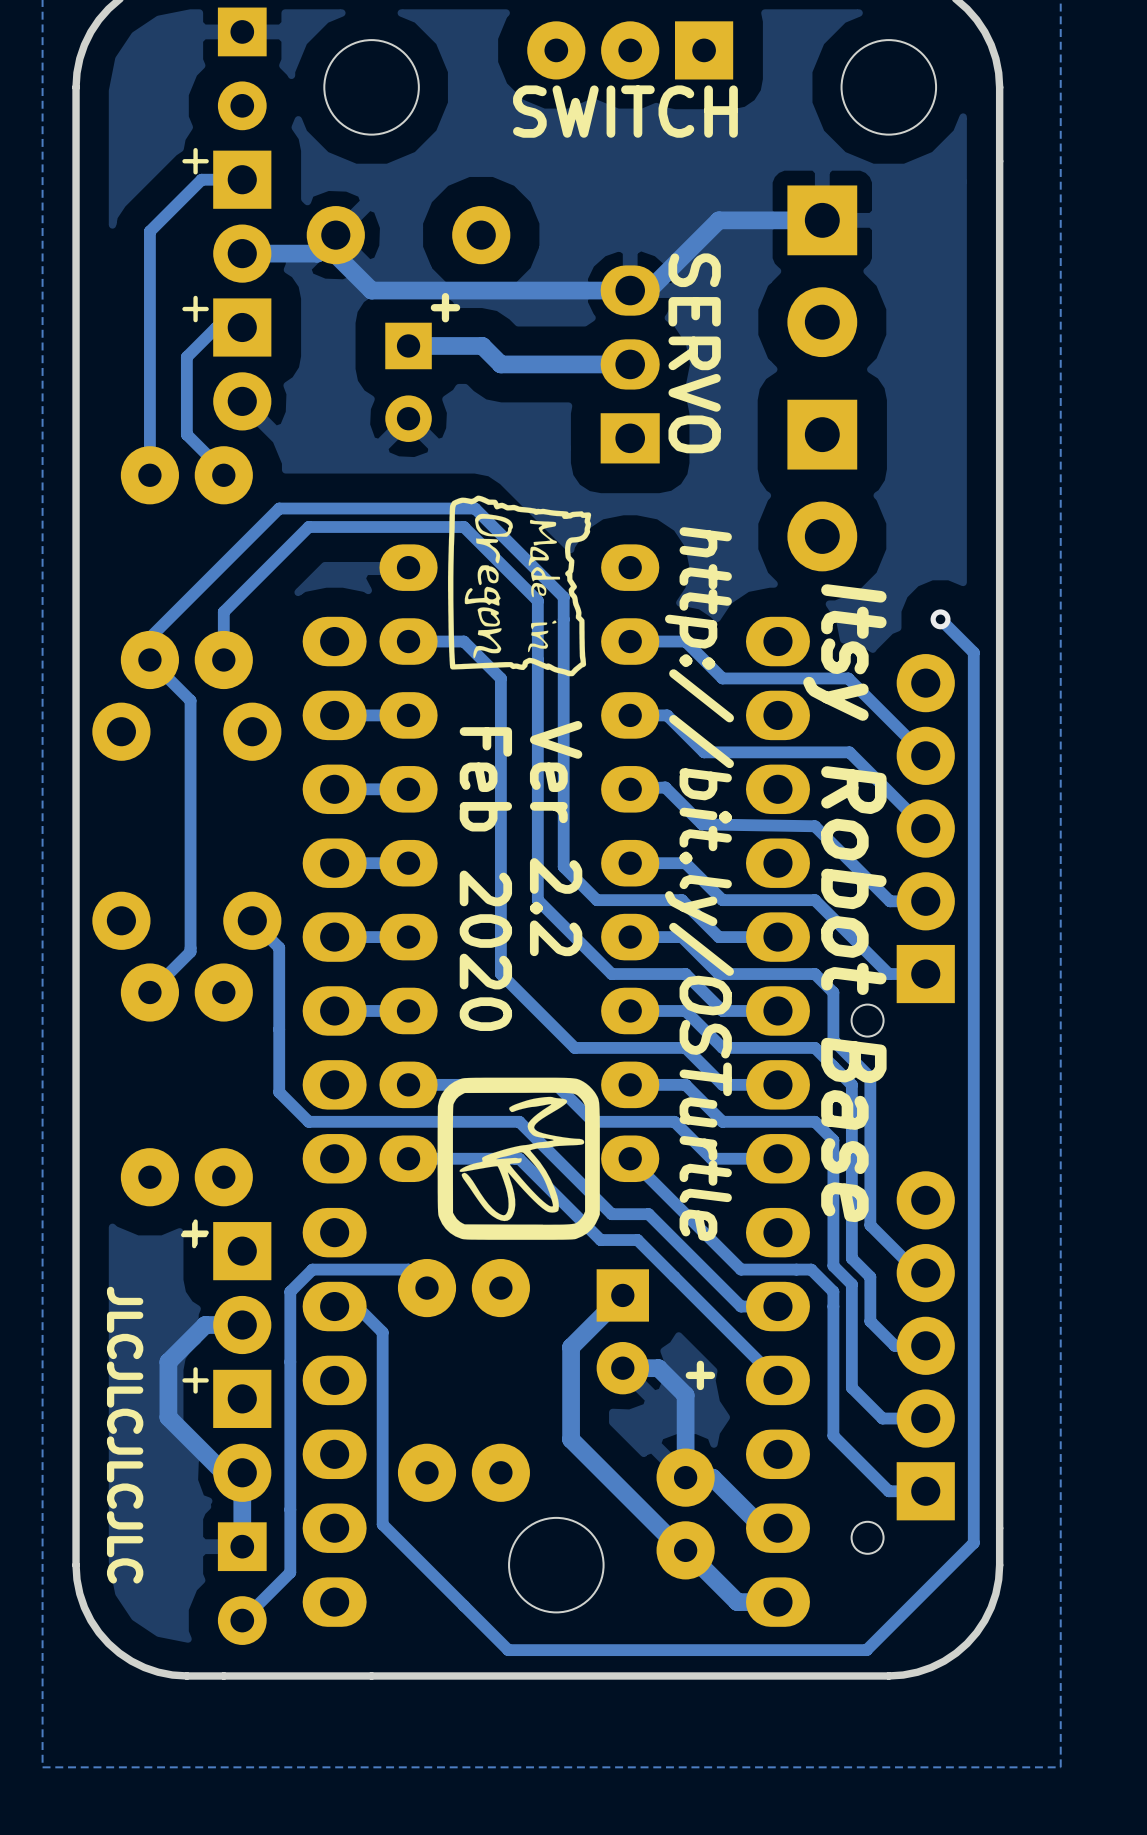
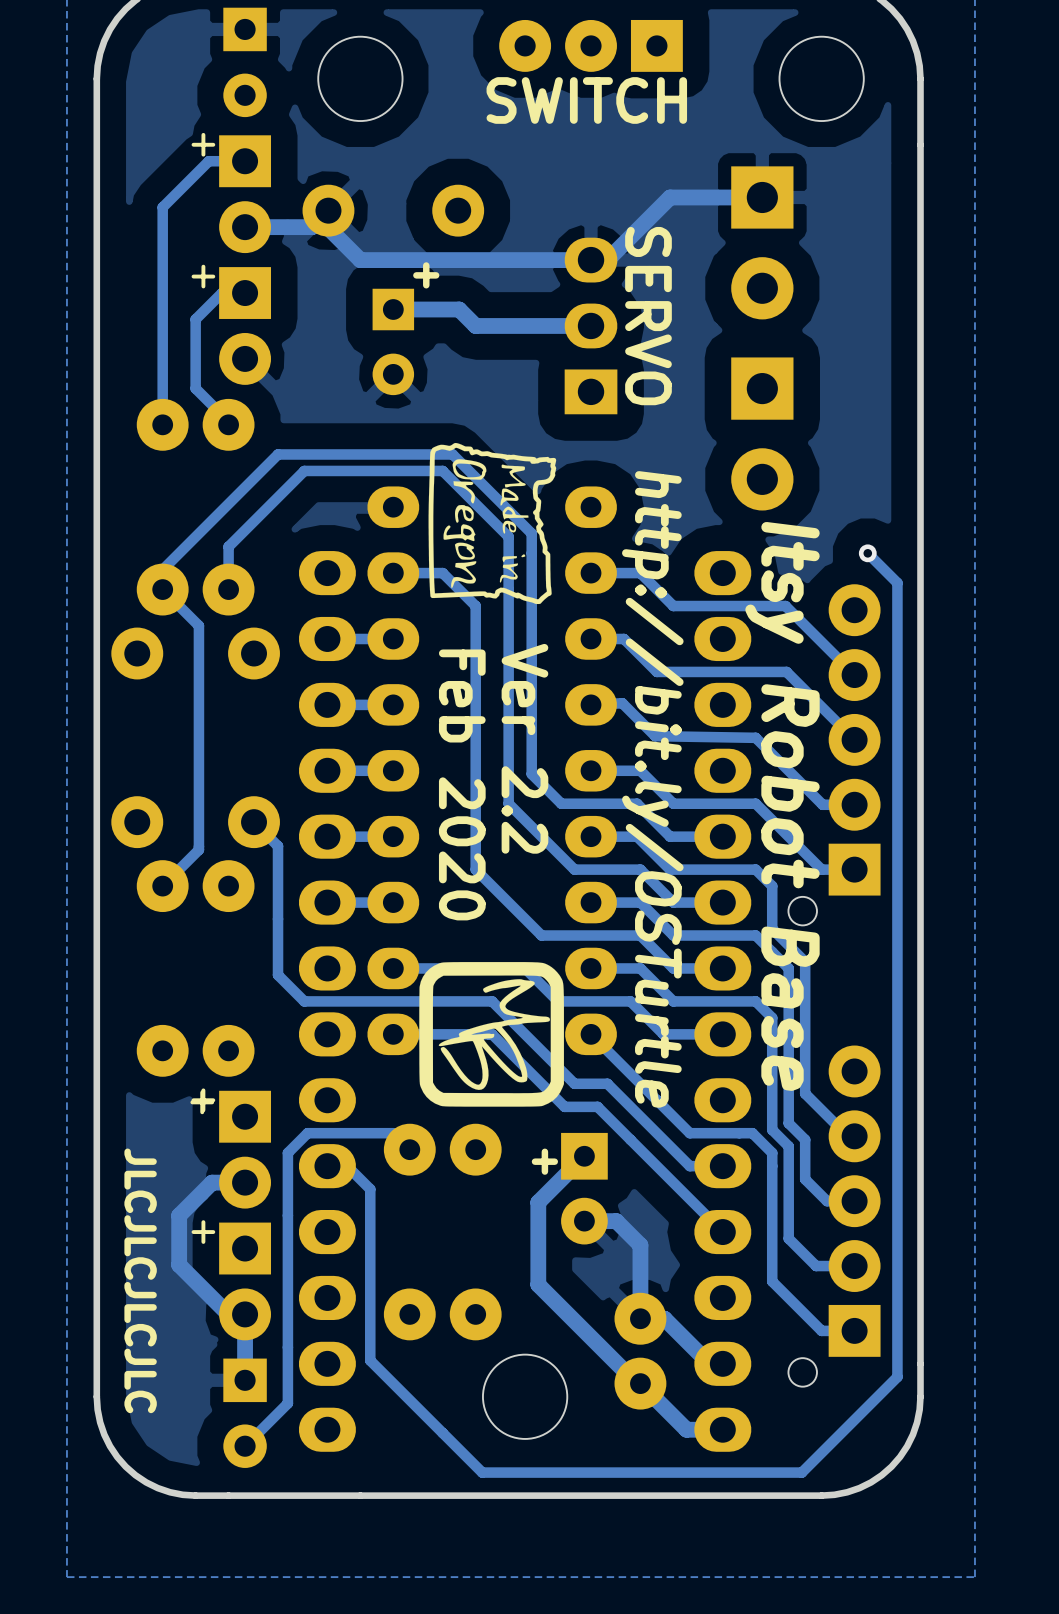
text position: + (700, 1375) -> + (544, 1161)

